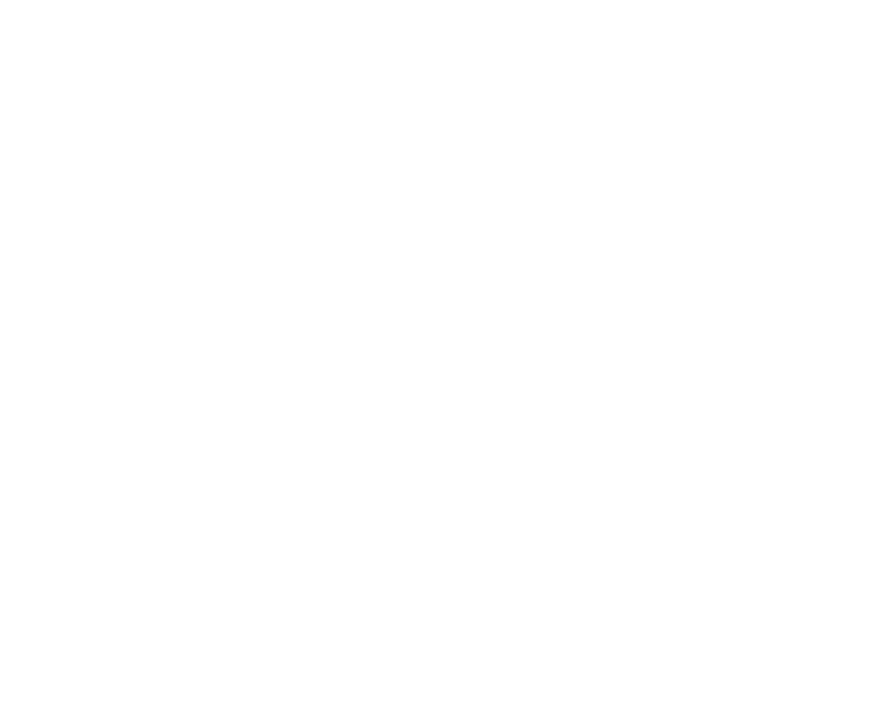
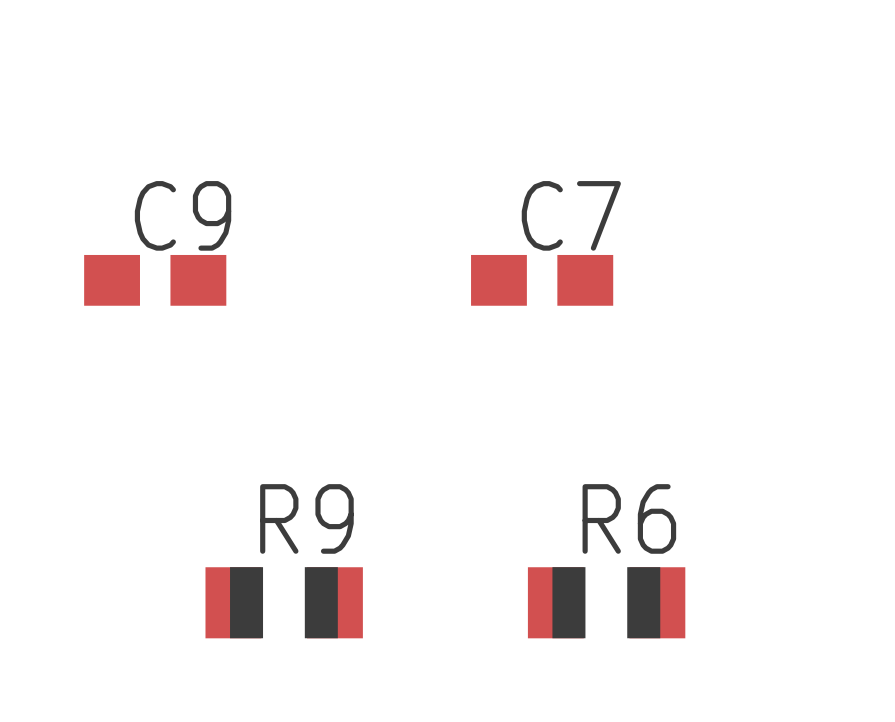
C9: none -> (155, 280)
C7: none -> (542, 280)
R9: none -> (284, 602)
R6: none -> (606, 602)

